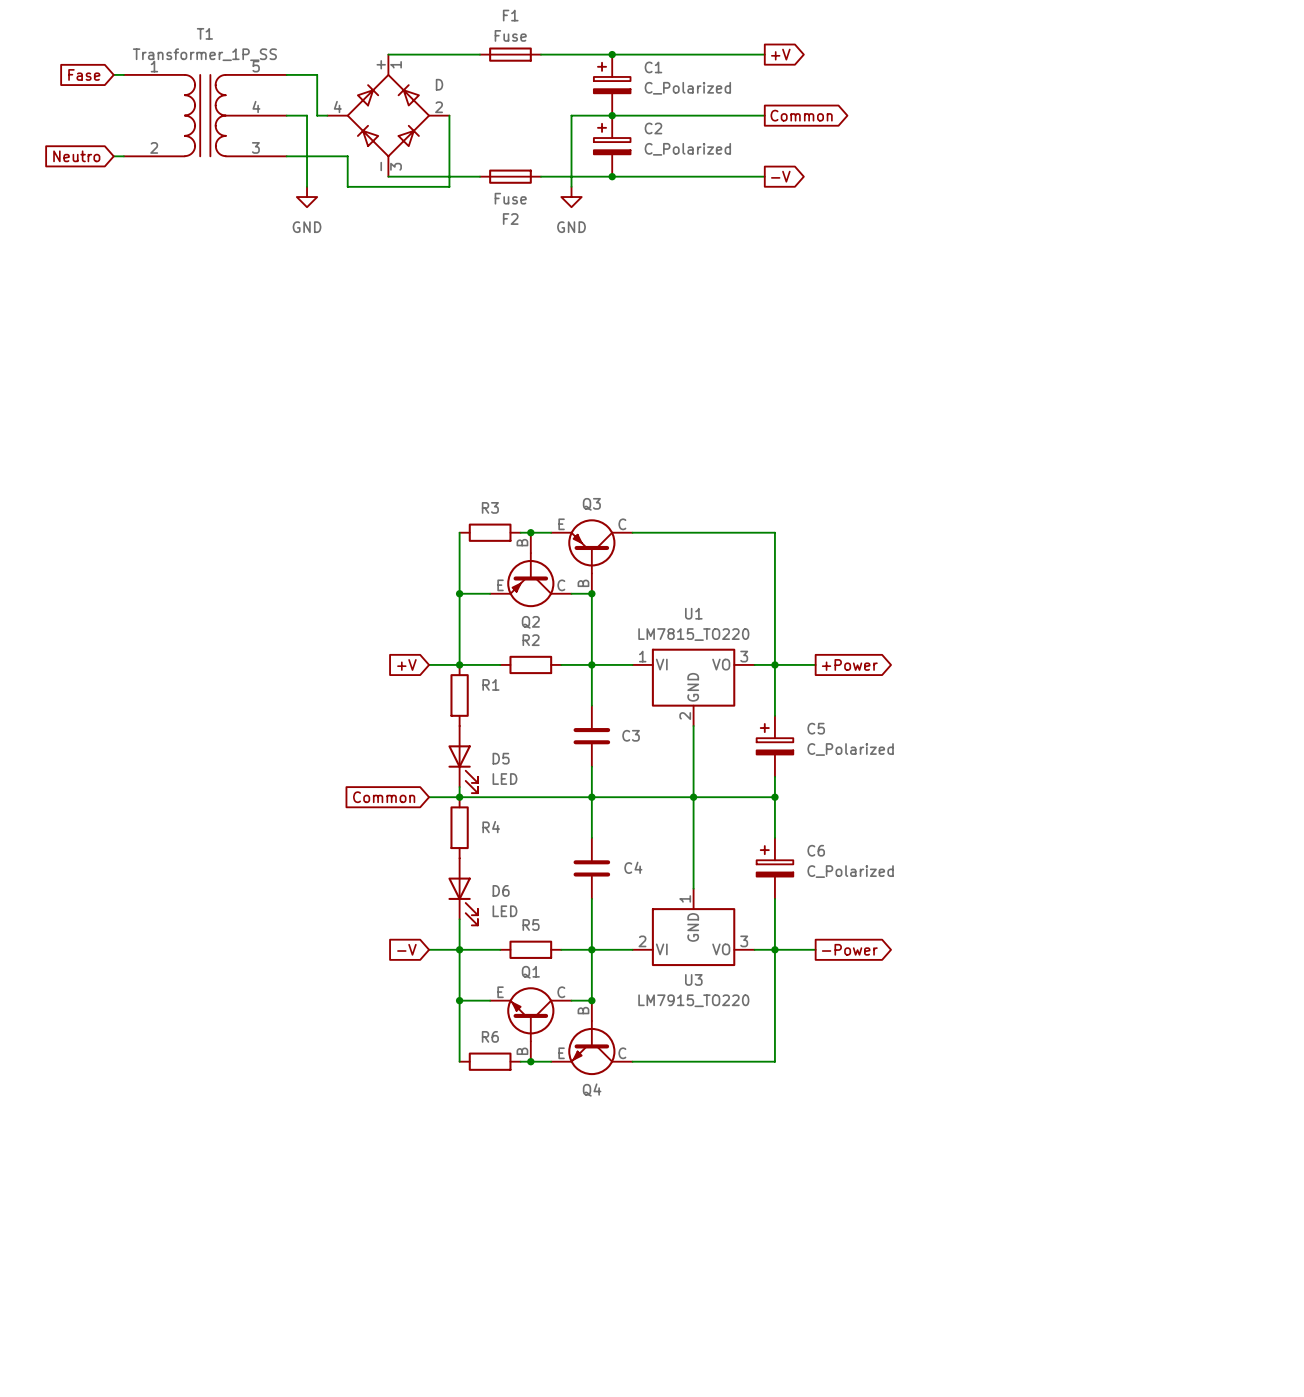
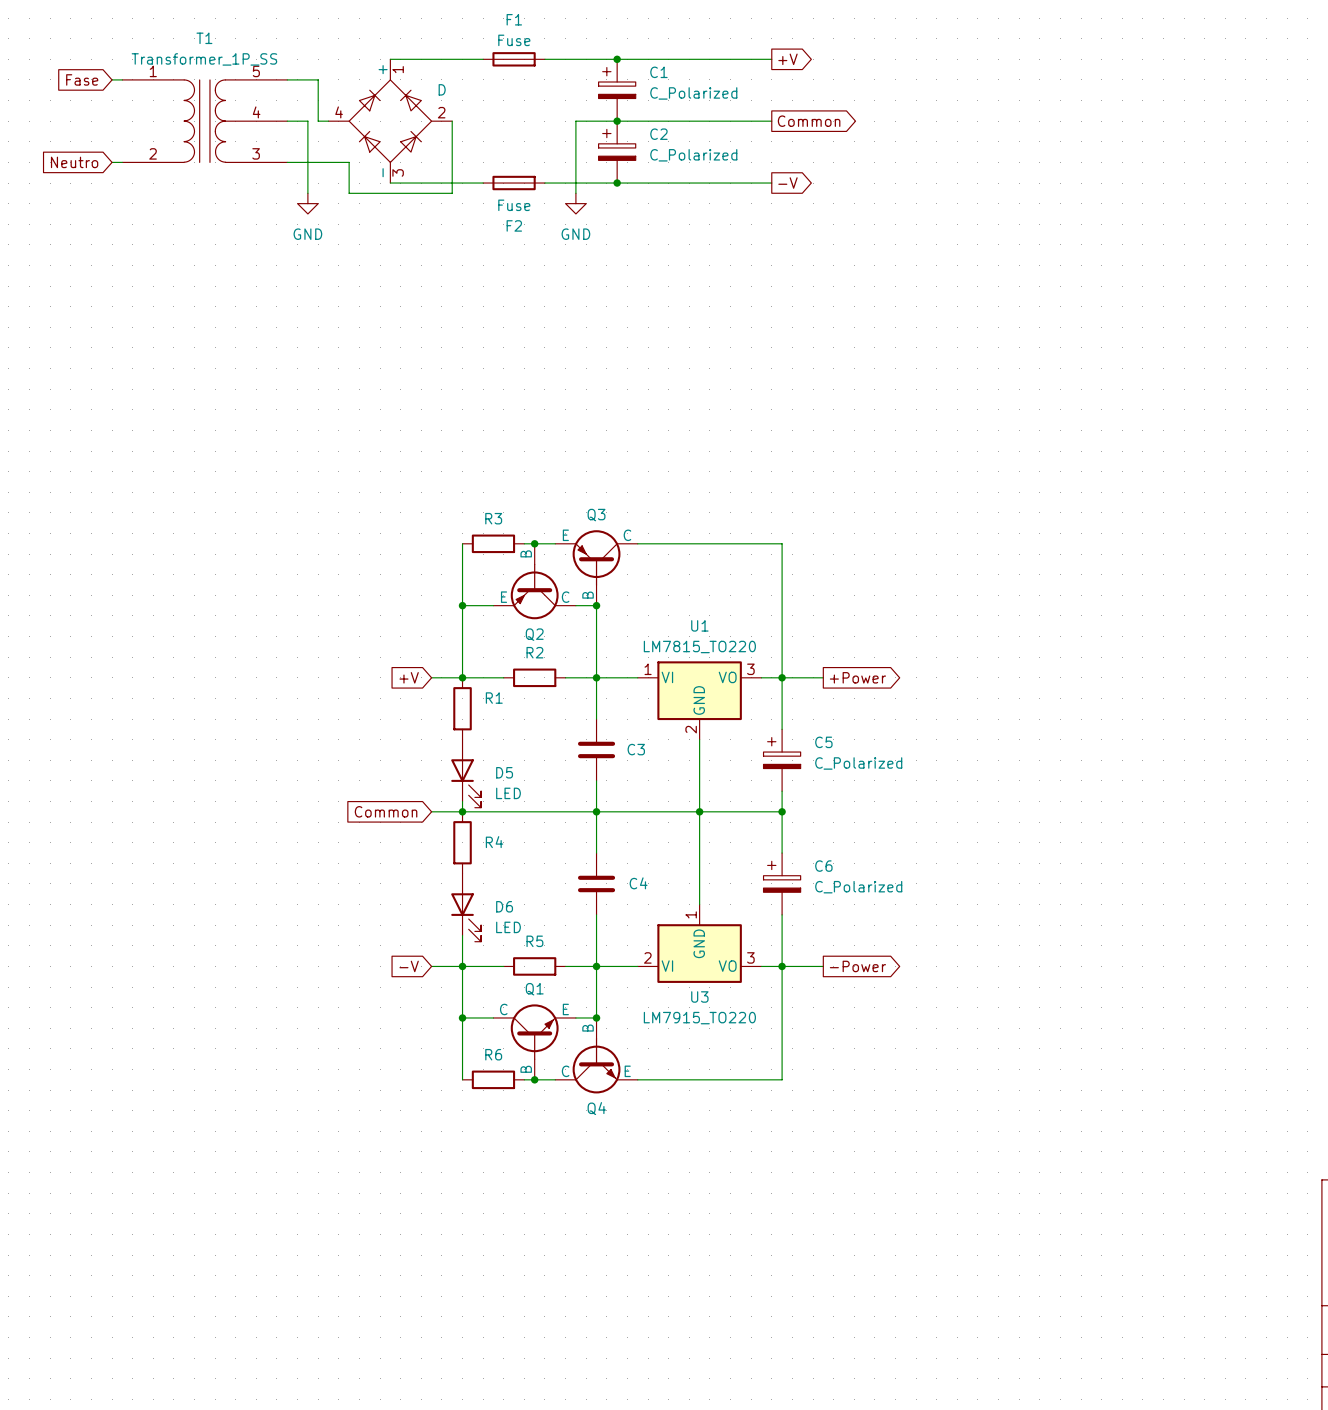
Q1 flip: as is (530, 1014) -> left-right (534, 1032)
Q4 flip: as is (591, 1047) -> left-right (596, 1065)

